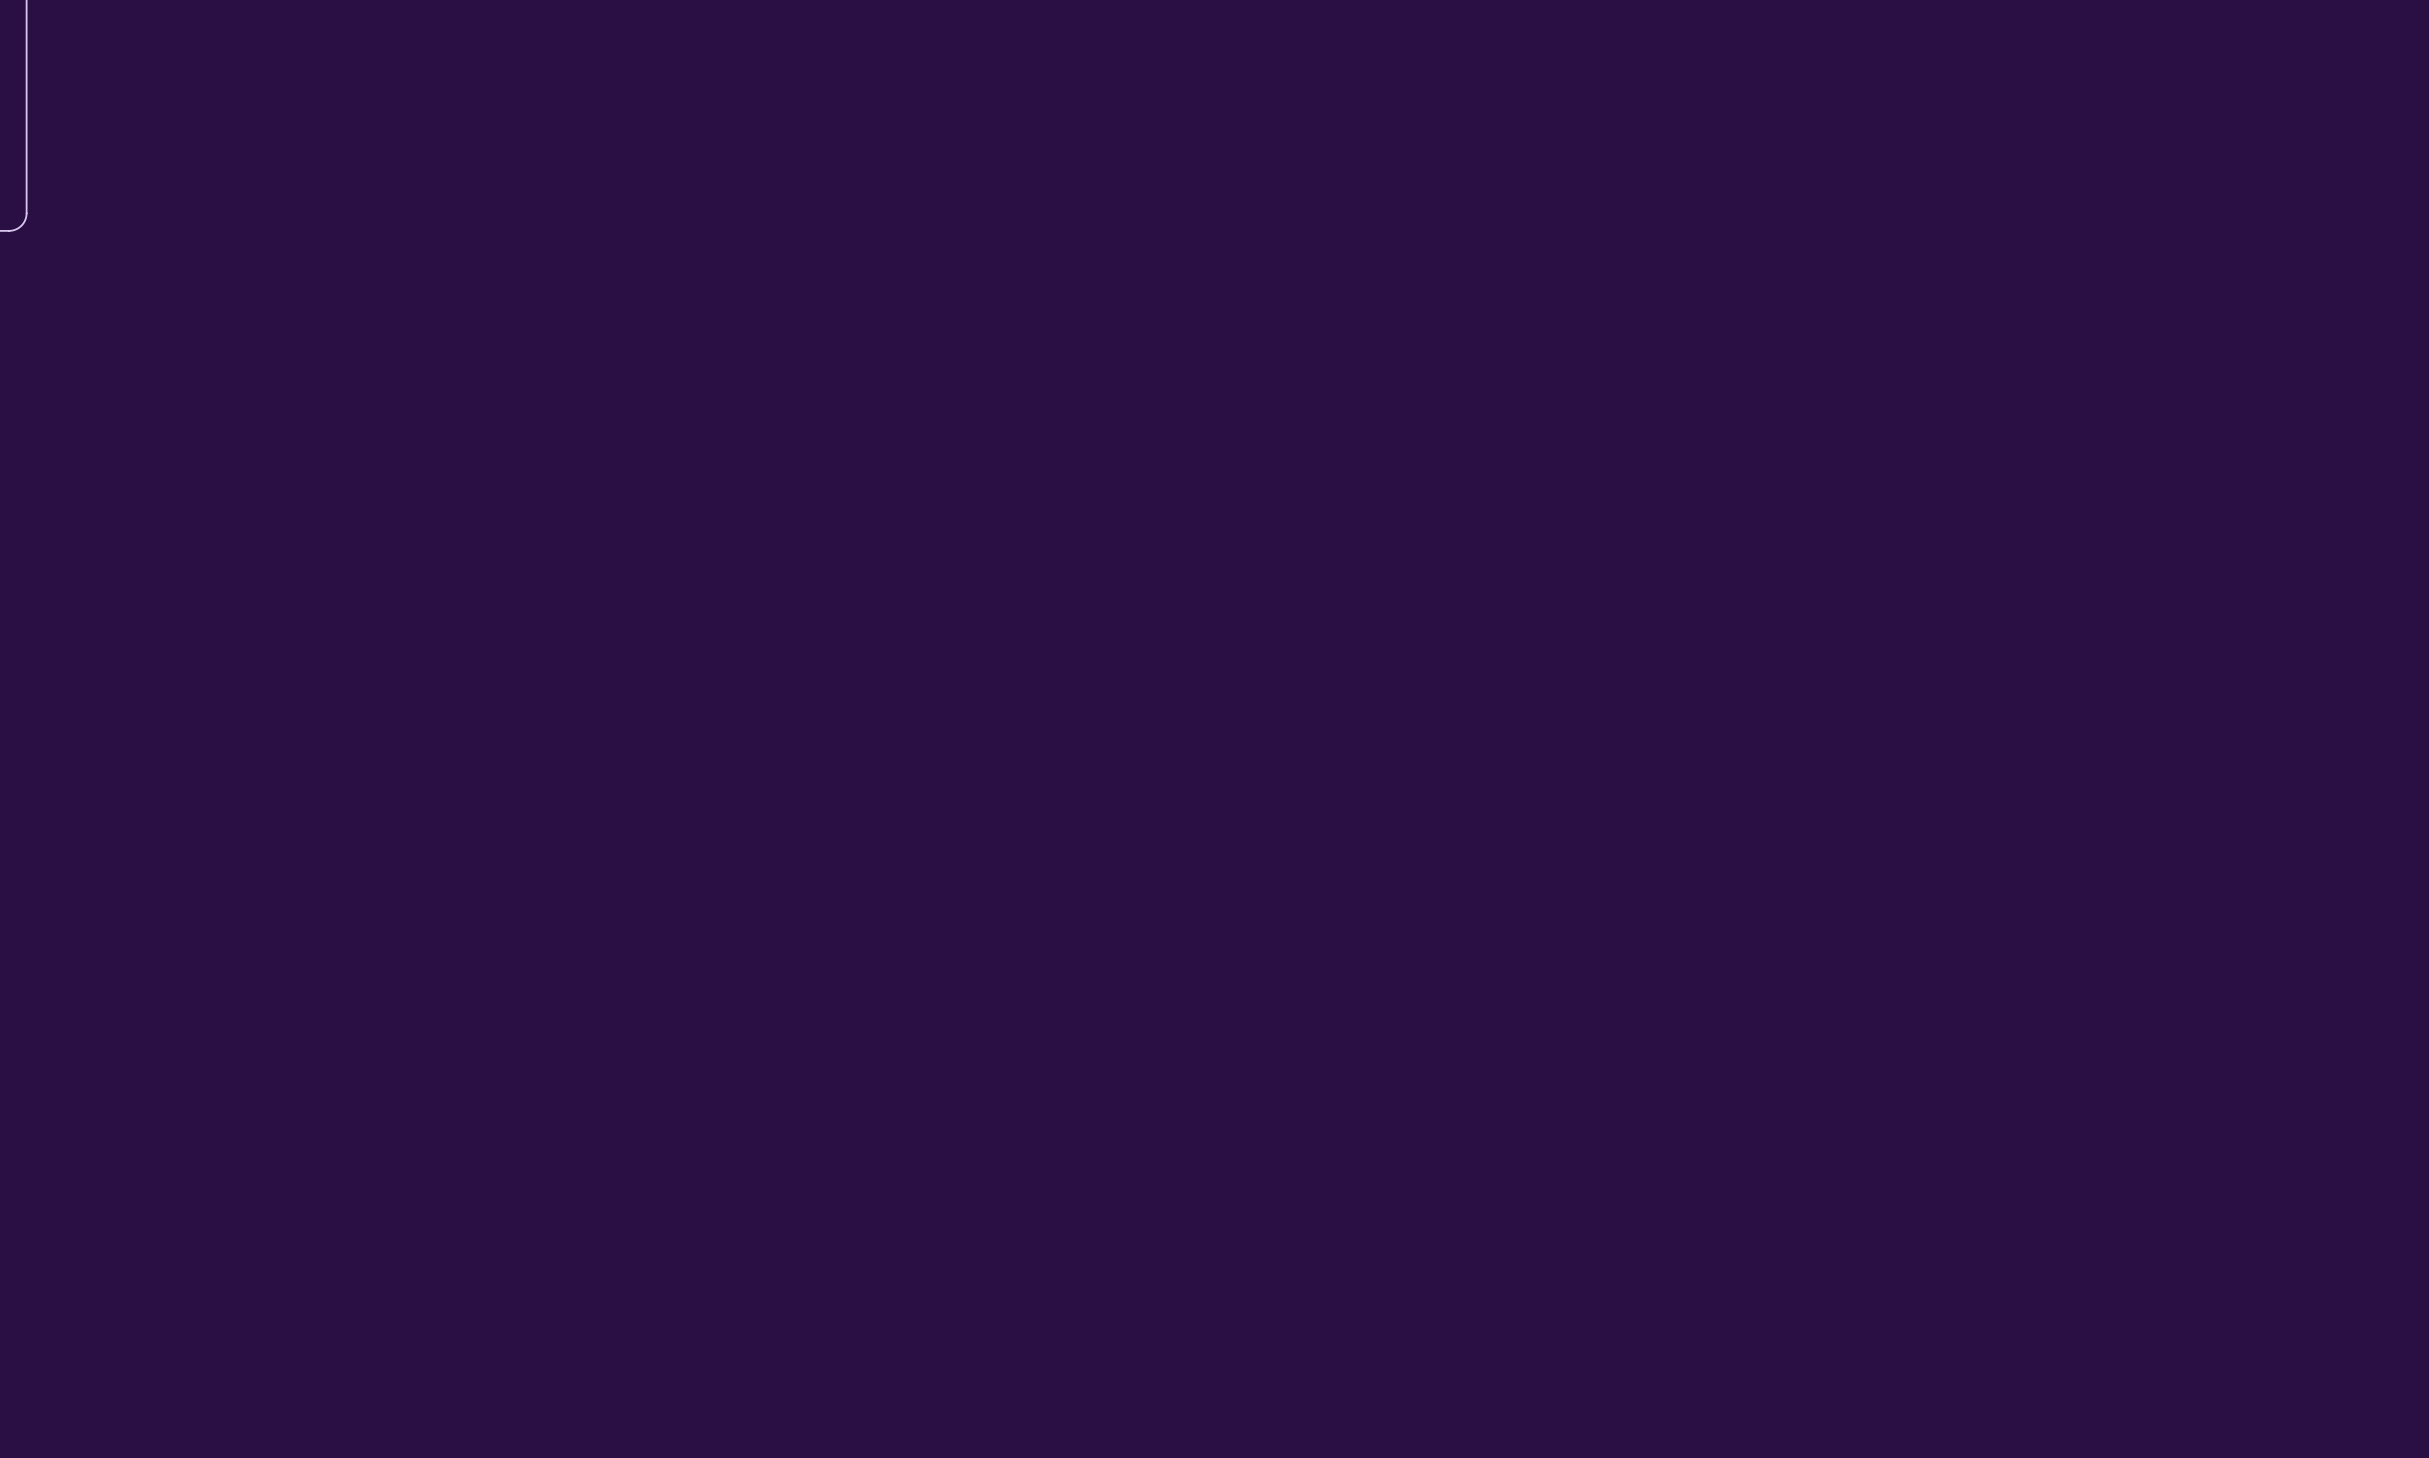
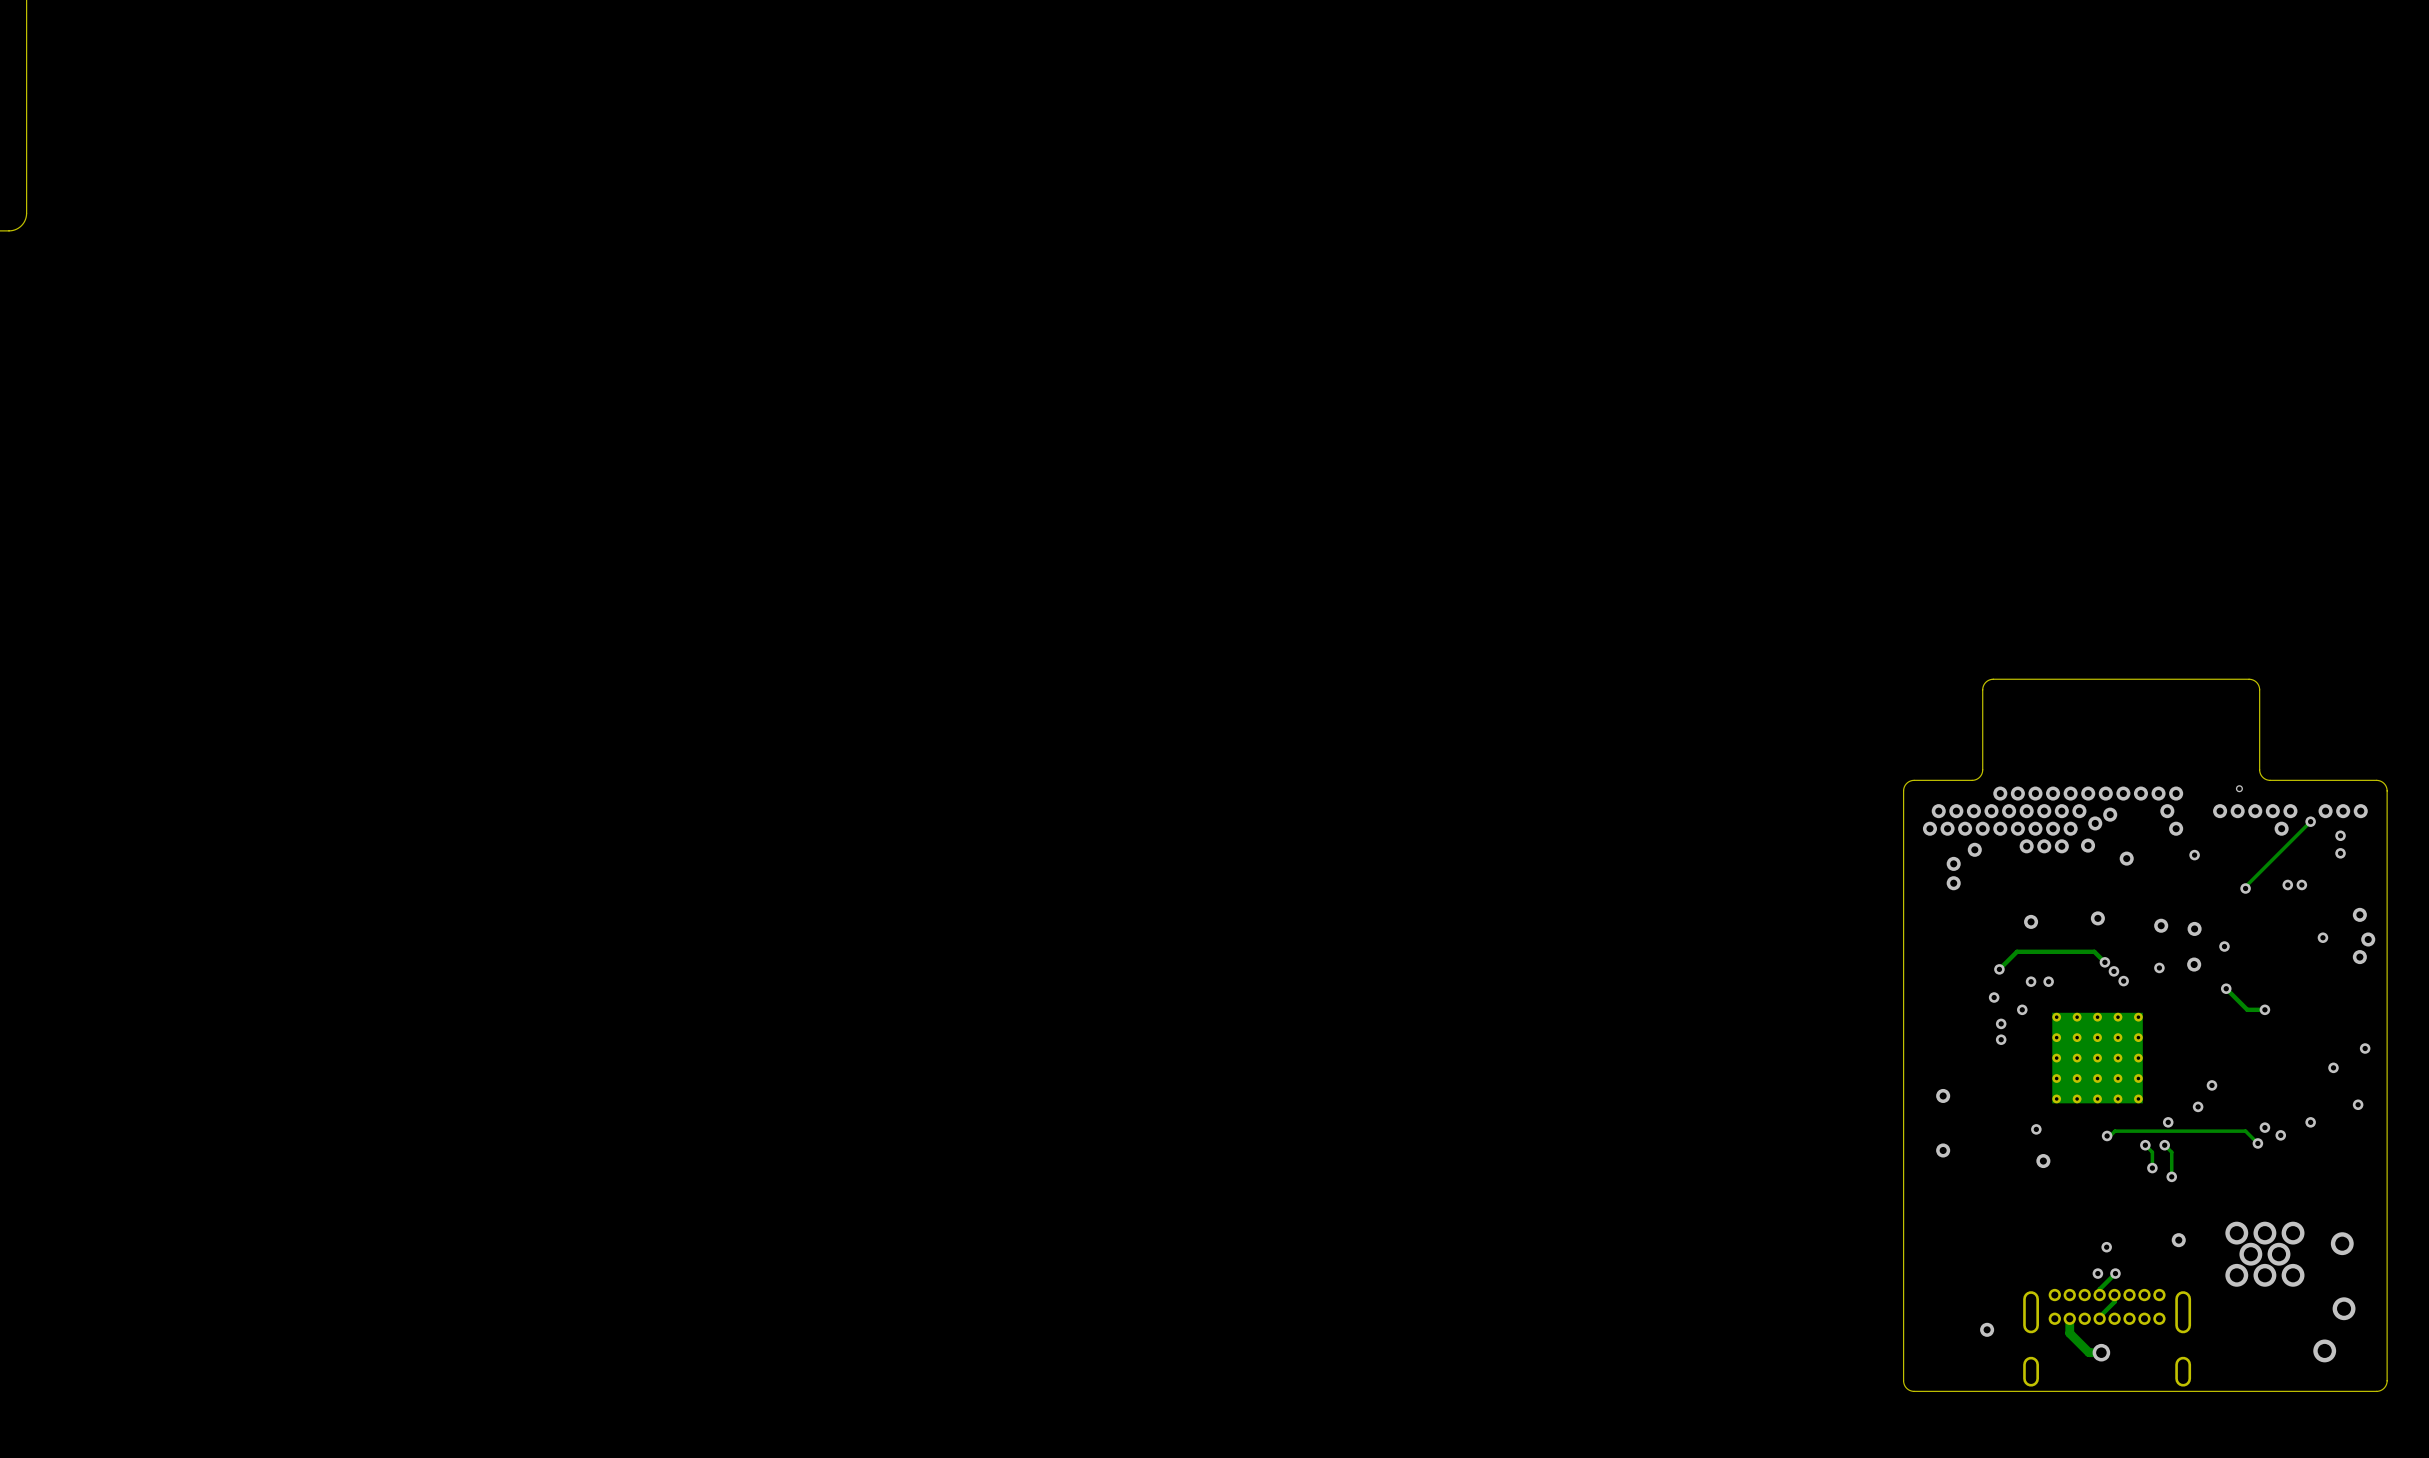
board edge: none -> (2249, 679) (1990, 679) (1984, 683) (1982, 688) (1982, 769) (1980, 776) (1972, 780) (1912, 780) (1904, 786) (1903, 1380) (1905, 1386) (1910, 1390) (2376, 1391) (2381, 1389) (2386, 1384) (2387, 789) (2384, 783) (2377, 780) (2270, 780) (2263, 778) (2259, 769) (2259, 688) (2256, 682) (2249, 679)
via: none -> (2239, 788)
via: none -> (2000, 793)
via: none -> (2017, 793)
via: none -> (2035, 793)
via: none -> (2053, 793)
via: none -> (2070, 793)
via: none -> (2088, 793)
via: none -> (2105, 793)
via: none -> (2123, 793)
via: none -> (2140, 793)
via: none -> (2158, 793)
via: none -> (2176, 793)
via: none -> (1938, 811)
via: none -> (1956, 811)
via: none -> (1973, 811)
via: none -> (1991, 811)
via: none -> (2009, 811)
via: none -> (2026, 811)
via: none -> (2044, 811)
via: none -> (2061, 811)
via: none -> (2079, 811)
via: none -> (2167, 811)
via: none -> (2220, 811)
via: none -> (2237, 811)
via: none -> (2255, 811)
via: none -> (2272, 811)
via: none -> (2290, 811)
via: none -> (2325, 811)
via: none -> (2343, 811)
via: none -> (2360, 811)
via: none -> (2110, 814)
track: none -> (2310, 821) (2245, 888)
via: none -> (2310, 821)
via: none -> (2095, 823)
via: none -> (1929, 828)
via: none -> (1947, 828)
via: none -> (1965, 828)
via: none -> (1982, 828)
via: none -> (2000, 828)
via: none -> (2017, 828)
via: none -> (2035, 828)
via: none -> (2053, 828)
via: none -> (2070, 828)
via: none -> (2176, 828)
via: none -> (2281, 828)
via: none -> (2340, 835)
via: none -> (2088, 845)
via: none -> (2026, 846)
via: none -> (2044, 846)
via: none -> (2061, 846)
via: none -> (1974, 849)
via: none -> (2340, 853)
via: none -> (2194, 855)
via: none -> (2126, 858)
via: none -> (1953, 863)
via: none -> (1953, 883)
via: none -> (2287, 884)
via: none -> (2301, 884)
via: none -> (2245, 888)
via: none -> (2359, 914)
via: none -> (2097, 918)
via: none -> (2031, 921)
via: none -> (2161, 925)
via: none -> (2194, 928)
via: none -> (2322, 937)
via: none -> (2368, 939)
via: none -> (2224, 946)
via: none -> (2359, 957)
track: none -> (2104, 962) (2094, 951) (2017, 951) (1999, 969)
via: none -> (2104, 962)
via: none -> (2194, 964)
via: none -> (2159, 967)
via: none -> (1999, 969)
via: none -> (2113, 971)
via: none -> (2031, 981)
via: none -> (2048, 981)
via: none -> (2123, 981)
track: none -> (2226, 988) (2247, 1009) (2264, 1009)
via: none -> (2226, 988)
via: none -> (1994, 997)
via: none -> (2022, 1009)
via: none -> (2264, 1009)
via: none -> (2001, 1023)
via: none -> (2001, 1039)
via: none -> (2365, 1048)
part: none -> (2097, 1058)
via: none -> (2333, 1067)
via: none -> (2211, 1085)
via: none -> (1943, 1095)
via: none -> (2358, 1104)
via: none -> (2198, 1106)
via: none -> (2168, 1122)
via: none -> (2310, 1122)
via: none -> (2264, 1127)
via: none -> (2036, 1129)
track: none -> (2107, 1135) (2110, 1135) (2115, 1131) (2245, 1131) (2257, 1143)
via: none -> (2107, 1135)
via: none -> (2280, 1135)
via: none -> (2257, 1143)
track: none -> (2145, 1145) (2152, 1152) (2152, 1168)
via: none -> (2145, 1145)
track: none -> (2164, 1145) (2171, 1152) (2171, 1176)
via: none -> (2164, 1145)
via: none -> (1943, 1150)
via: none -> (2043, 1161)
via: none -> (2152, 1168)
via: none -> (2171, 1176)
via: none -> (2236, 1233)
via: none -> (2264, 1233)
via: none -> (2293, 1233)
via: none -> (2178, 1240)
via: none -> (2342, 1243)
via: none -> (2106, 1247)
via: none -> (2250, 1254)
via: none -> (2278, 1254)
via: none -> (2097, 1273)
track: none -> (2115, 1273) (2099, 1289) (2099, 1295)
via: none -> (2115, 1273)
via: none -> (2236, 1275)
via: none -> (2264, 1275)
via: none -> (2293, 1275)
track: none -> (2114, 1295) (2114, 1301) (2099, 1318)
via: none -> (2344, 1308)
track: none -> (2069, 1318) (2069, 1333) (2089, 1352) (2101, 1352)
via: none -> (1987, 1329)
part: none -> (2107, 1337)
via: none -> (2324, 1350)
via: none -> (2101, 1352)

